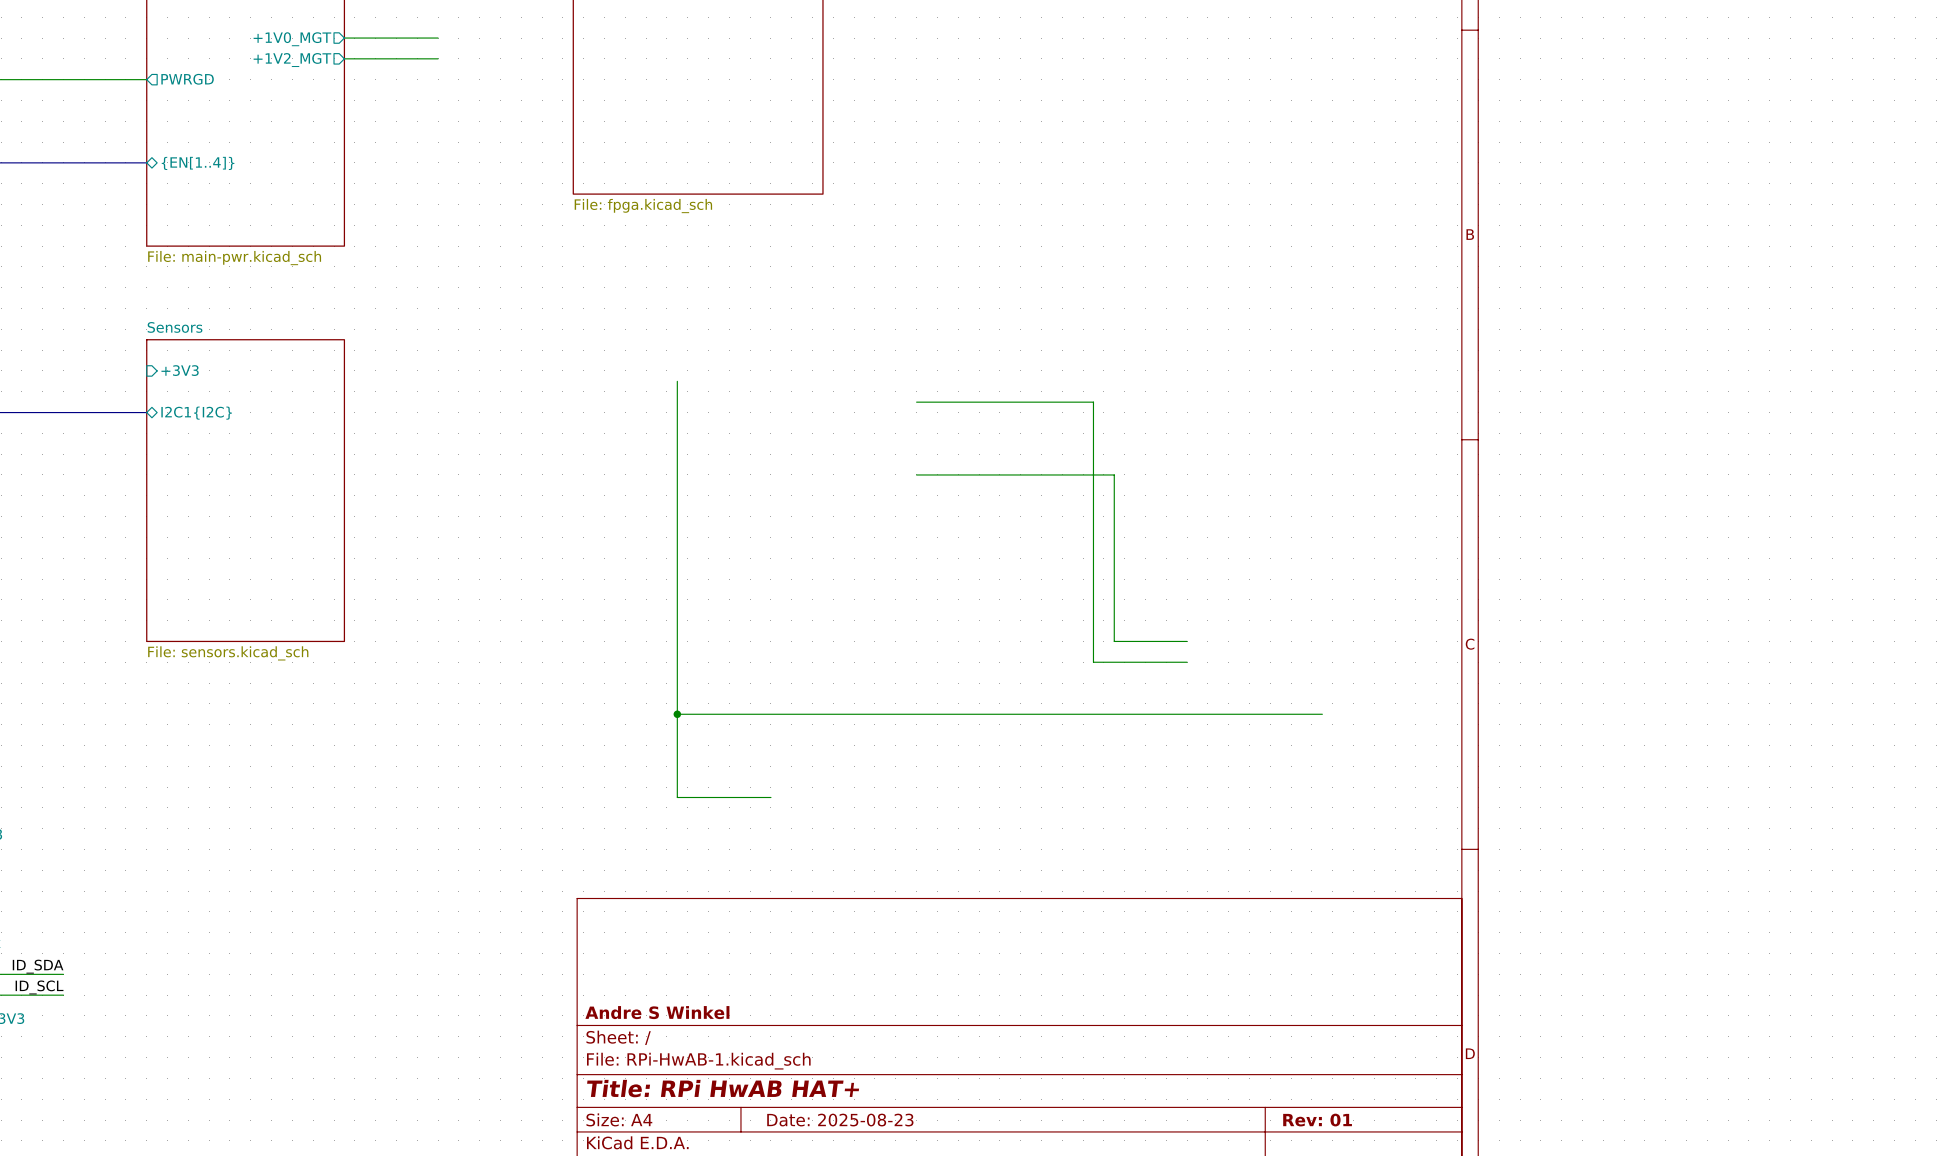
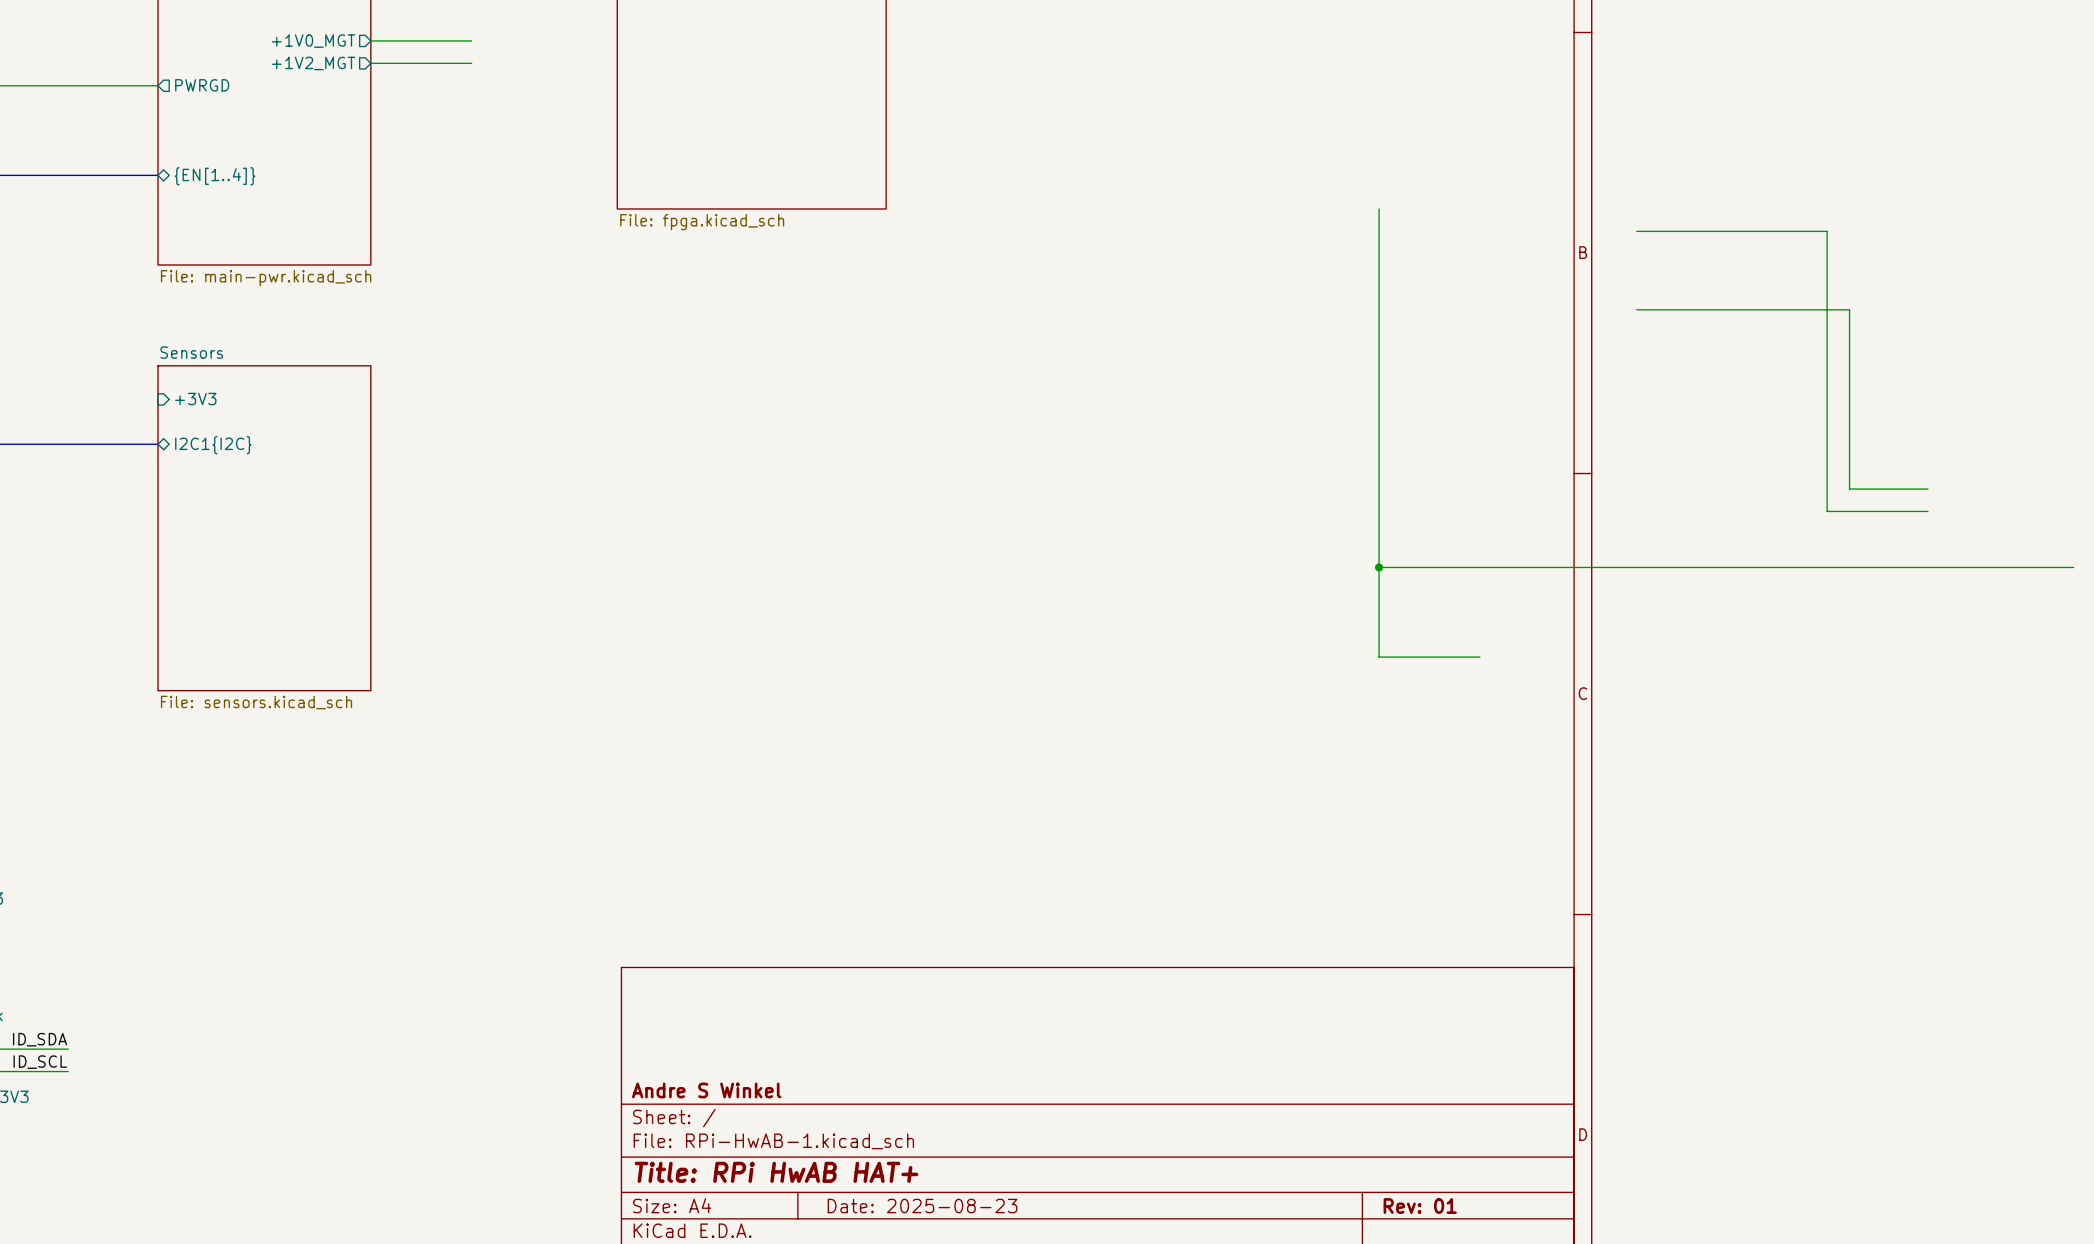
wire: none -> (1379, 208) (1379, 657) (1479, 657)
wire: none -> (1636, 231) (1827, 231) (1827, 511) (1927, 511)
wire: none -> (1636, 309) (1849, 309) (1849, 489) (1927, 489)
wire: (677, 381) (677, 797) (770, 797) -> none
wire: (916, 402) (1093, 402) (1093, 662) (1187, 662) -> none
wire: (916, 474) (1114, 474) (1114, 641) (1187, 641) -> none
wire: none -> (1379, 567) (2073, 567)
junction: none -> (1379, 567)
wire: (677, 714) (1322, 714) -> none
junction: (677, 714) -> none

